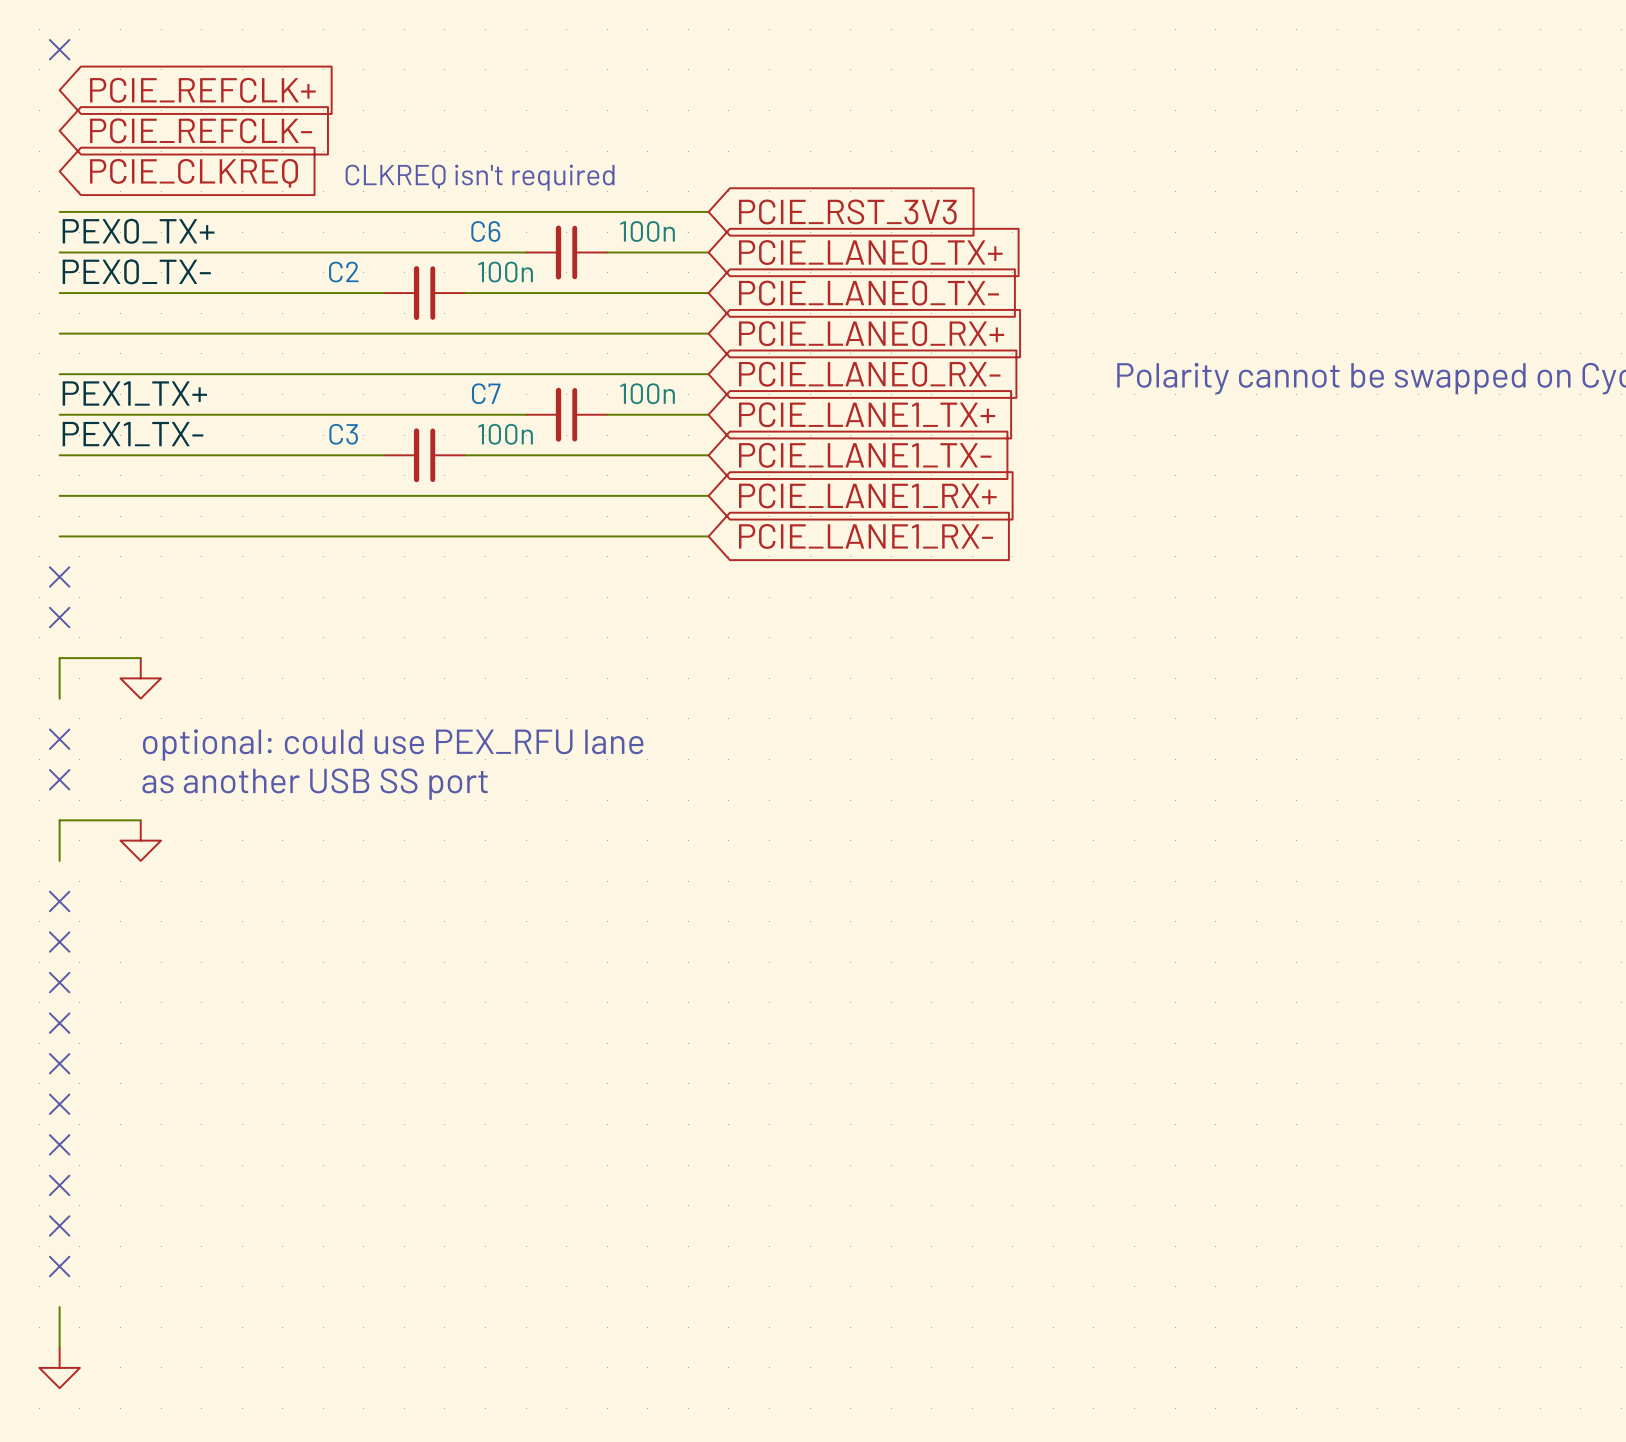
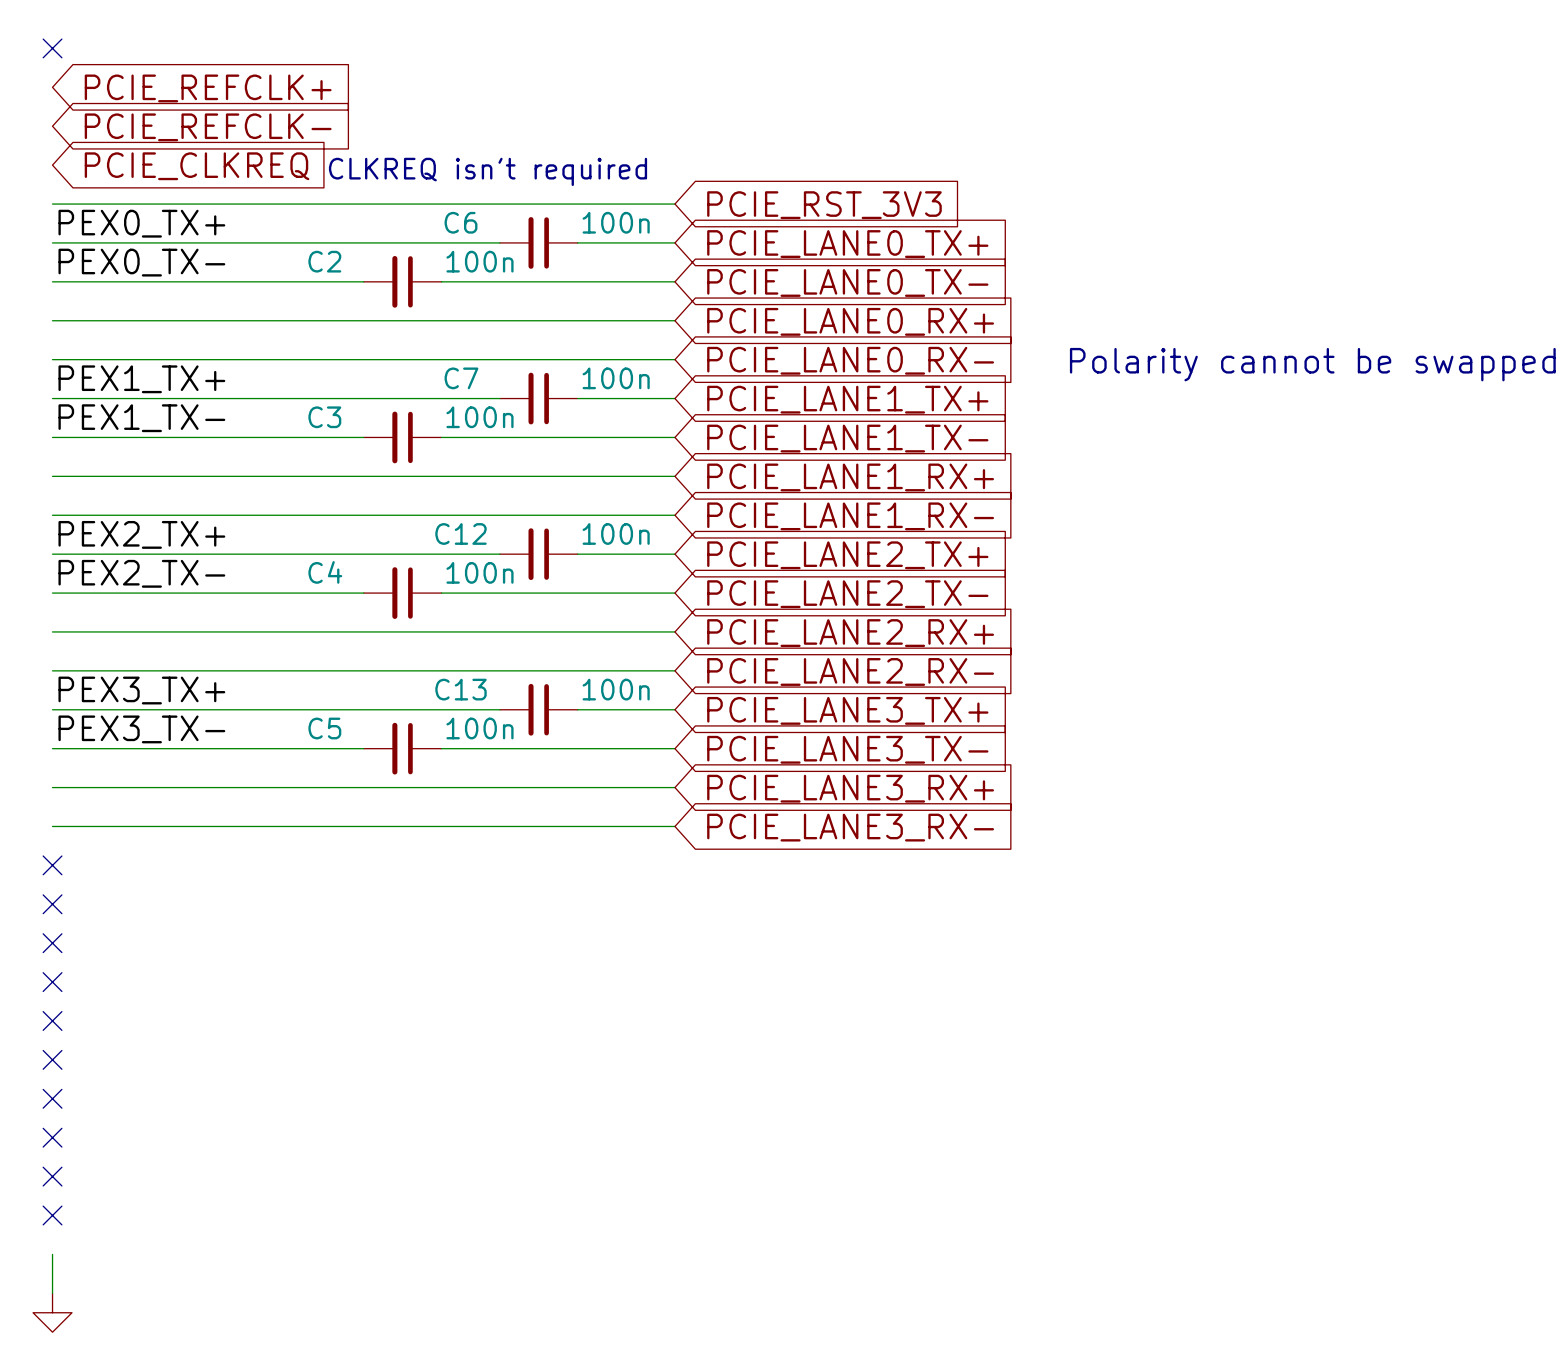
label: none -> PEX2_TX+ (141, 534)
wire: none -> (52, 554) (499, 554)
no-connect mark: (59, 576) -> none
C12: none -> 100n (538, 554)
wire: none -> (577, 554) (674, 554)
global label: none -> PCIE_LANE2_TX+ (847, 555)
label: none -> PEX2_TX- (141, 573)
wire: none -> (52, 593) (363, 593)
no-connect mark: (59, 617) -> none
C4: none -> 100n (402, 593)
wire: none -> (441, 593) (674, 593)
global label: none -> PCIE_LANE2_TX- (847, 594)
wire: (59, 658) (59, 698) -> (674, 670) (52, 670)
wire: none -> (130, 631) (674, 631)
global label: none -> PCIE_LANE2_RX+ (850, 633)
power symbol: (140, 678) -> none
global label: none -> PCIE_LANE2_RX- (850, 671)
label: none -> PEX3_TX+ (141, 690)
wire: none -> (52, 709) (499, 709)
no-connect mark: (59, 739) -> none
C13: none -> 100n (538, 709)
wire: none -> (577, 709) (674, 709)
global label: none -> PCIE_LANE3_TX+ (847, 710)
text: optional: could use PEX_RFU lane (393, 744) -> none
label: none -> PEX3_TX- (141, 729)
wire: none -> (52, 748) (363, 748)
no-connect mark: (59, 779) -> none
C5: none -> 100n (402, 748)
wire: none -> (441, 748) (674, 748)
global label: none -> PCIE_LANE3_TX- (847, 749)
text: as another USB SS port (315, 784) -> none
wire: (59, 820) (59, 860) -> (674, 826) (52, 826)
wire: none -> (130, 787) (674, 787)
global label: none -> PCIE_LANE3_RX+ (850, 788)
power symbol: (140, 840) -> none
global label: none -> PCIE_LANE3_RX- (850, 827)

